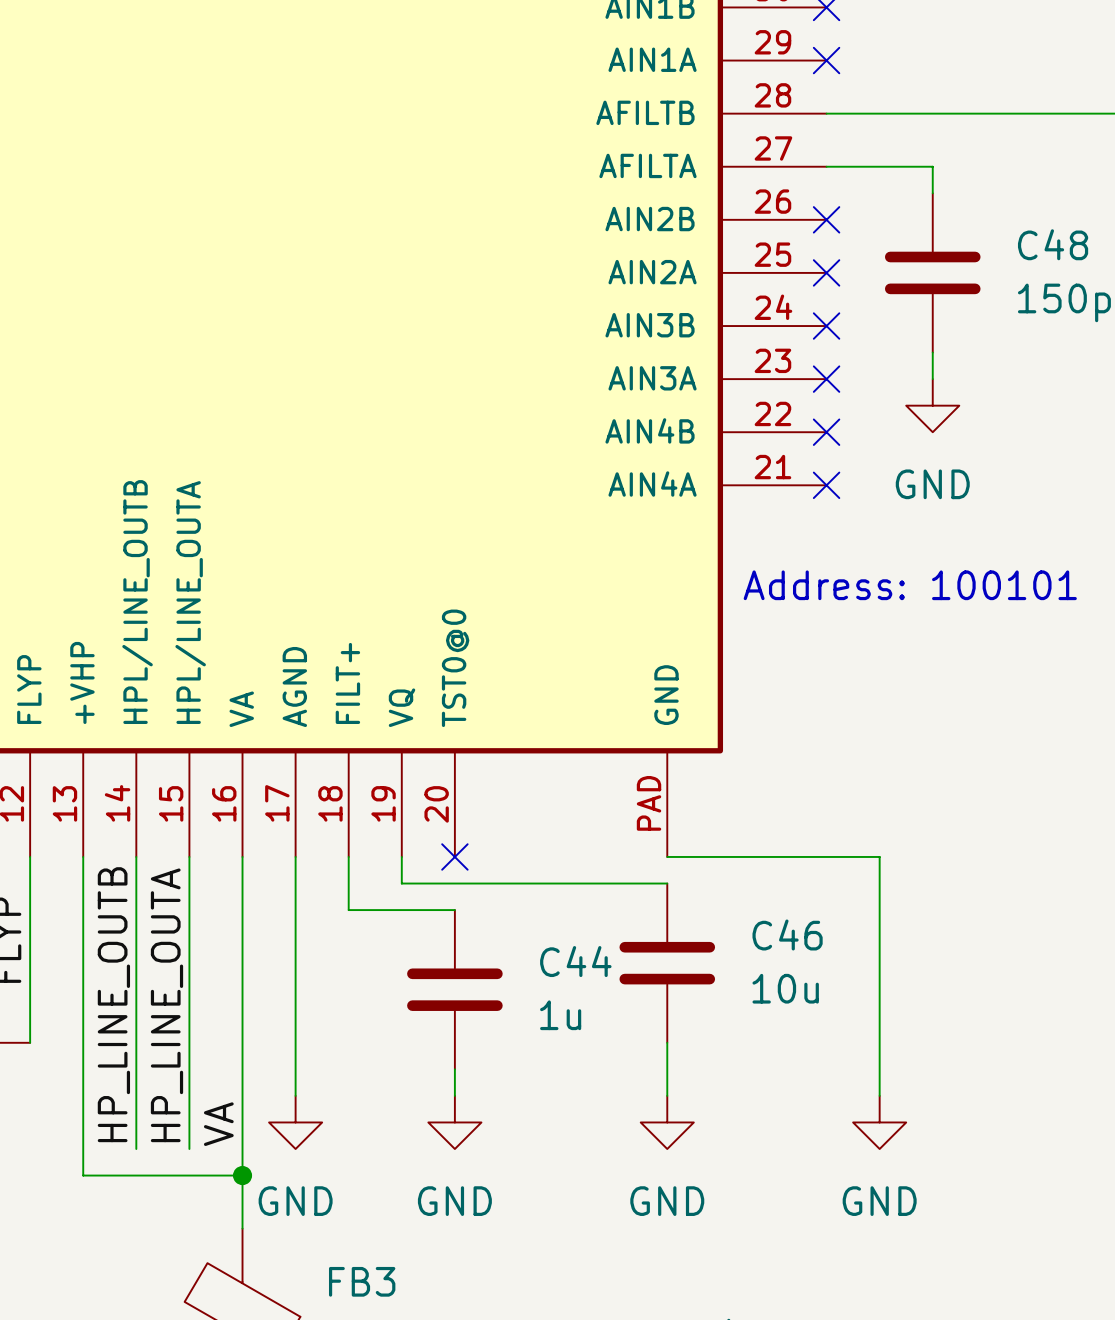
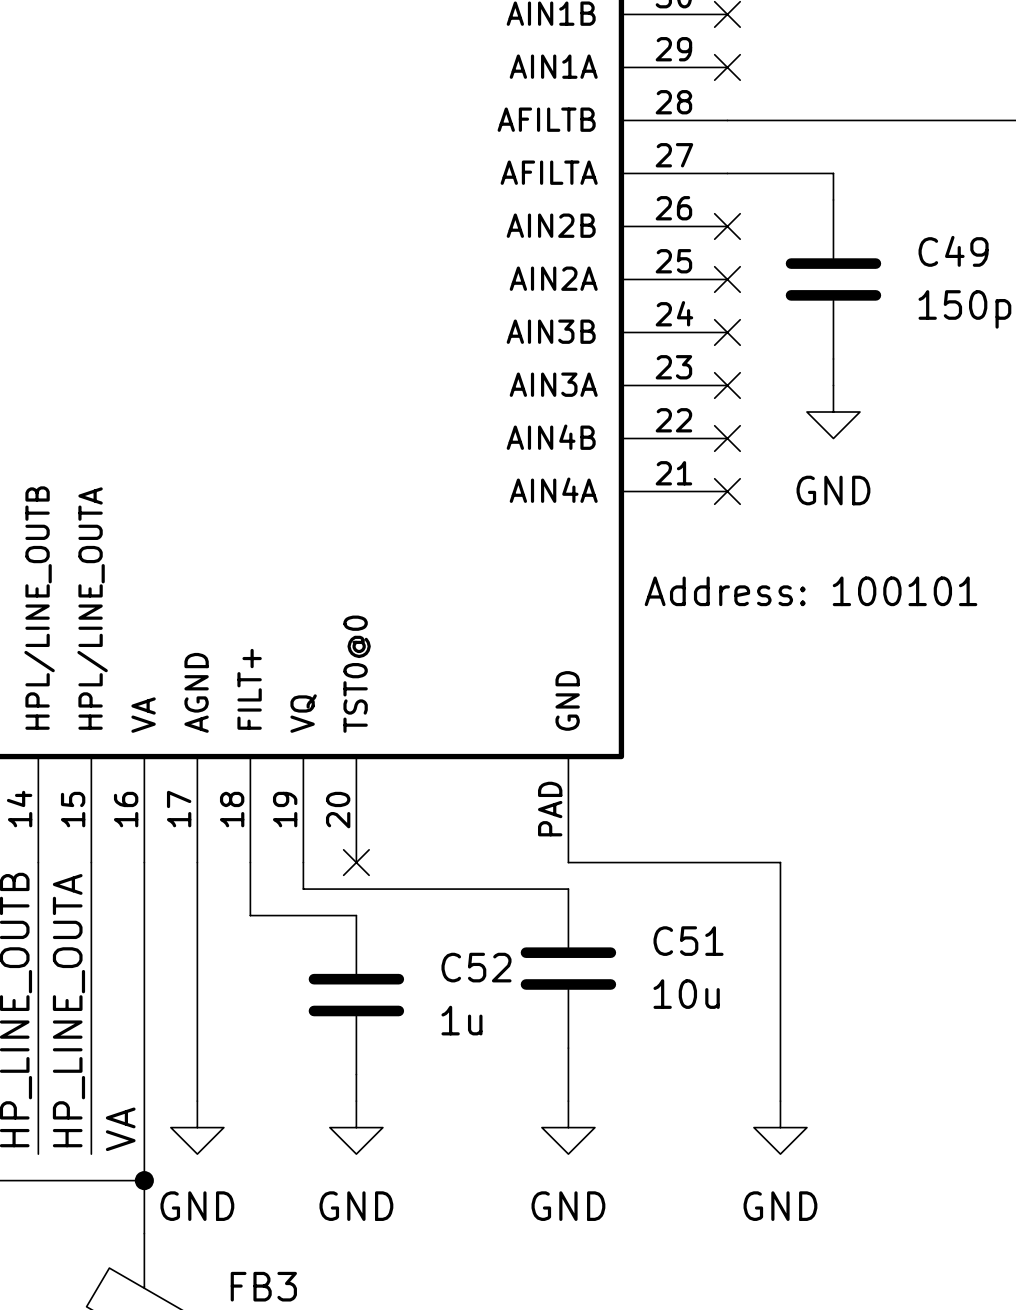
C48 name: C48 (1053, 244) -> C49 (953, 251)
C46 name: C46 (787, 934) -> C51 (688, 941)
C44 name: C44 (575, 961) -> C52 (476, 967)

